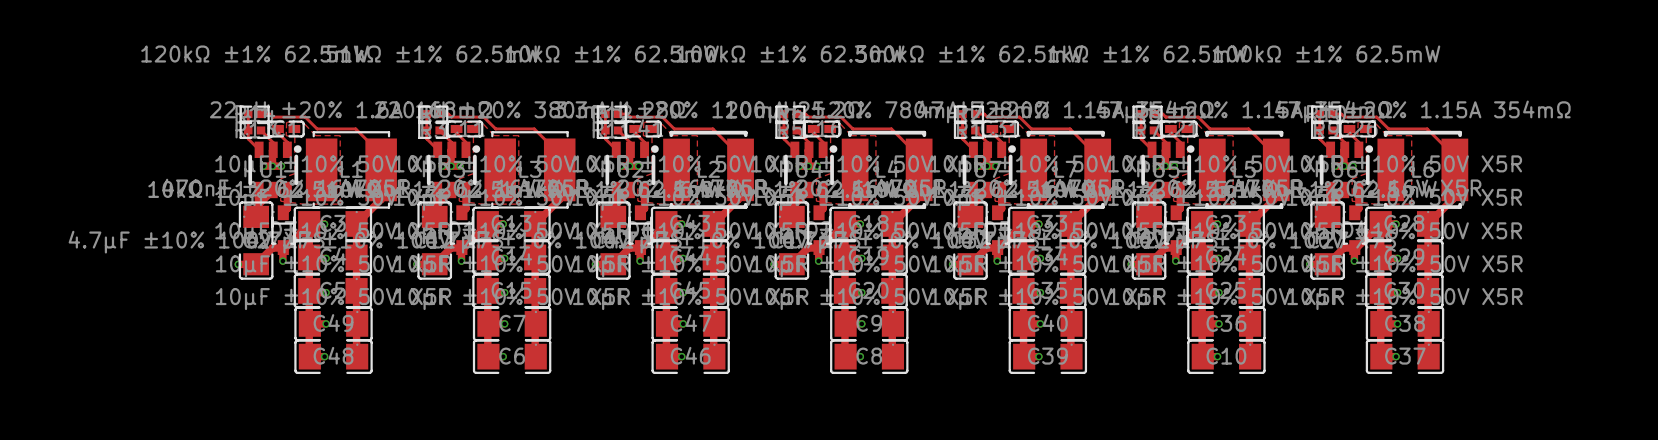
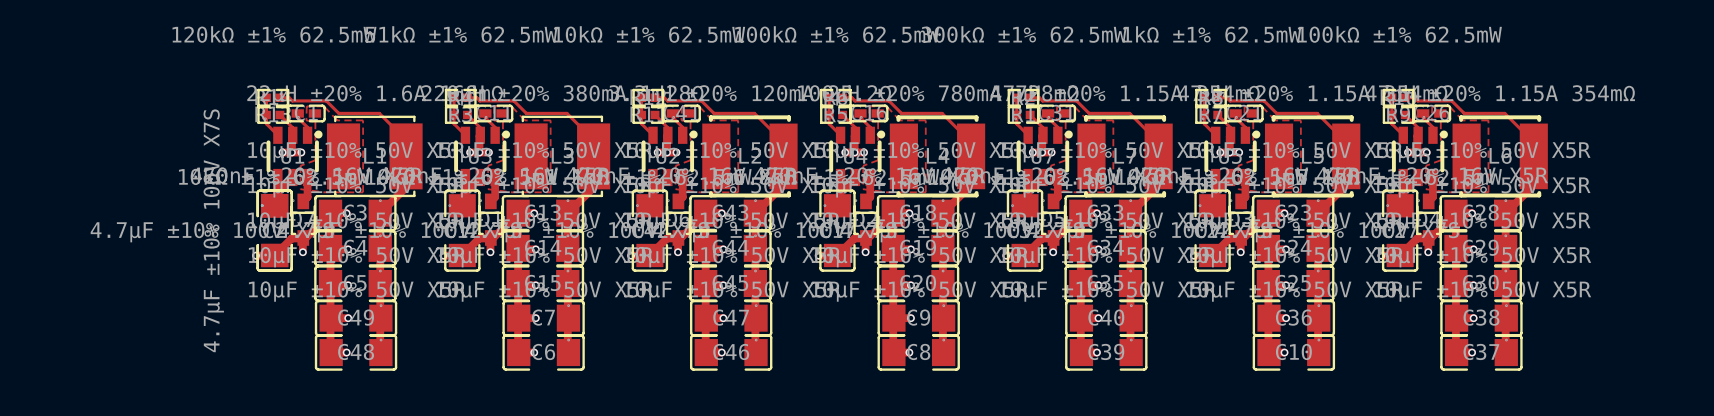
part: none -> 4.7µF ±10% 100V X7S (274, 230)

